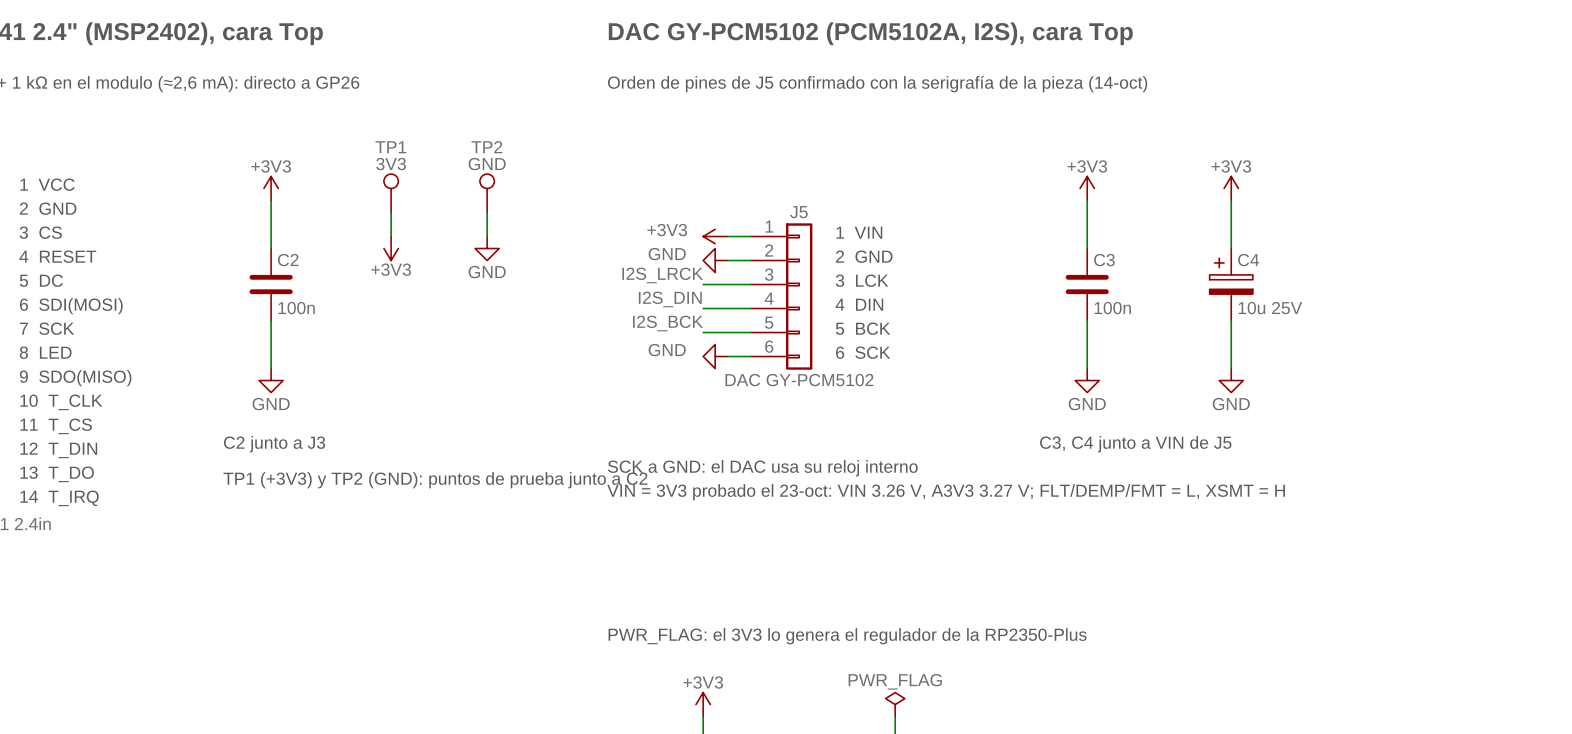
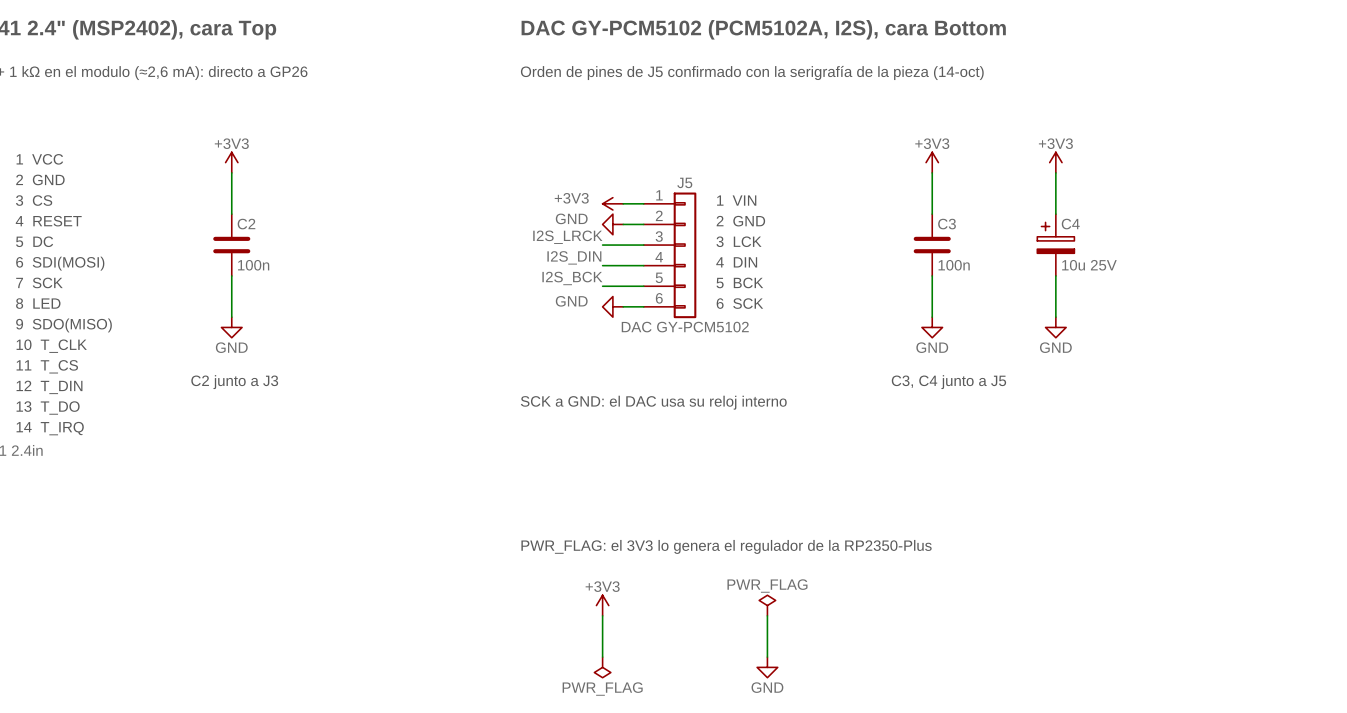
text: DAC GY-PCM5102 (PCM5102A, I2S), cara Top (870, 33) -> DAC GY-PCM5102 (PCM5102A, I2S), cara Bottom (763, 29)
TP1: 3V3 (391, 193) -> none
TP2: GND (487, 193) -> none
wire: (391, 212) (391, 236) -> none
wire: (487, 212) (487, 236) -> none
power symbol: +3V3 (391, 248) -> none
power symbol: GND (487, 248) -> none
text: C3, C4 junto a VIN de J5 (1135, 444) -> C3, C4 junto a J5 (948, 382)
text: TP1 (+3V3) y TP2 (GND): puntos de prueba junto a C2 (435, 480) -> none
text: VIN = 3V3 probado el 23-oct: VIN 3.26 V, A3V3 3.27 V; FLT/DEMP/FMT = L, XSMT = H (946, 492) -> none

